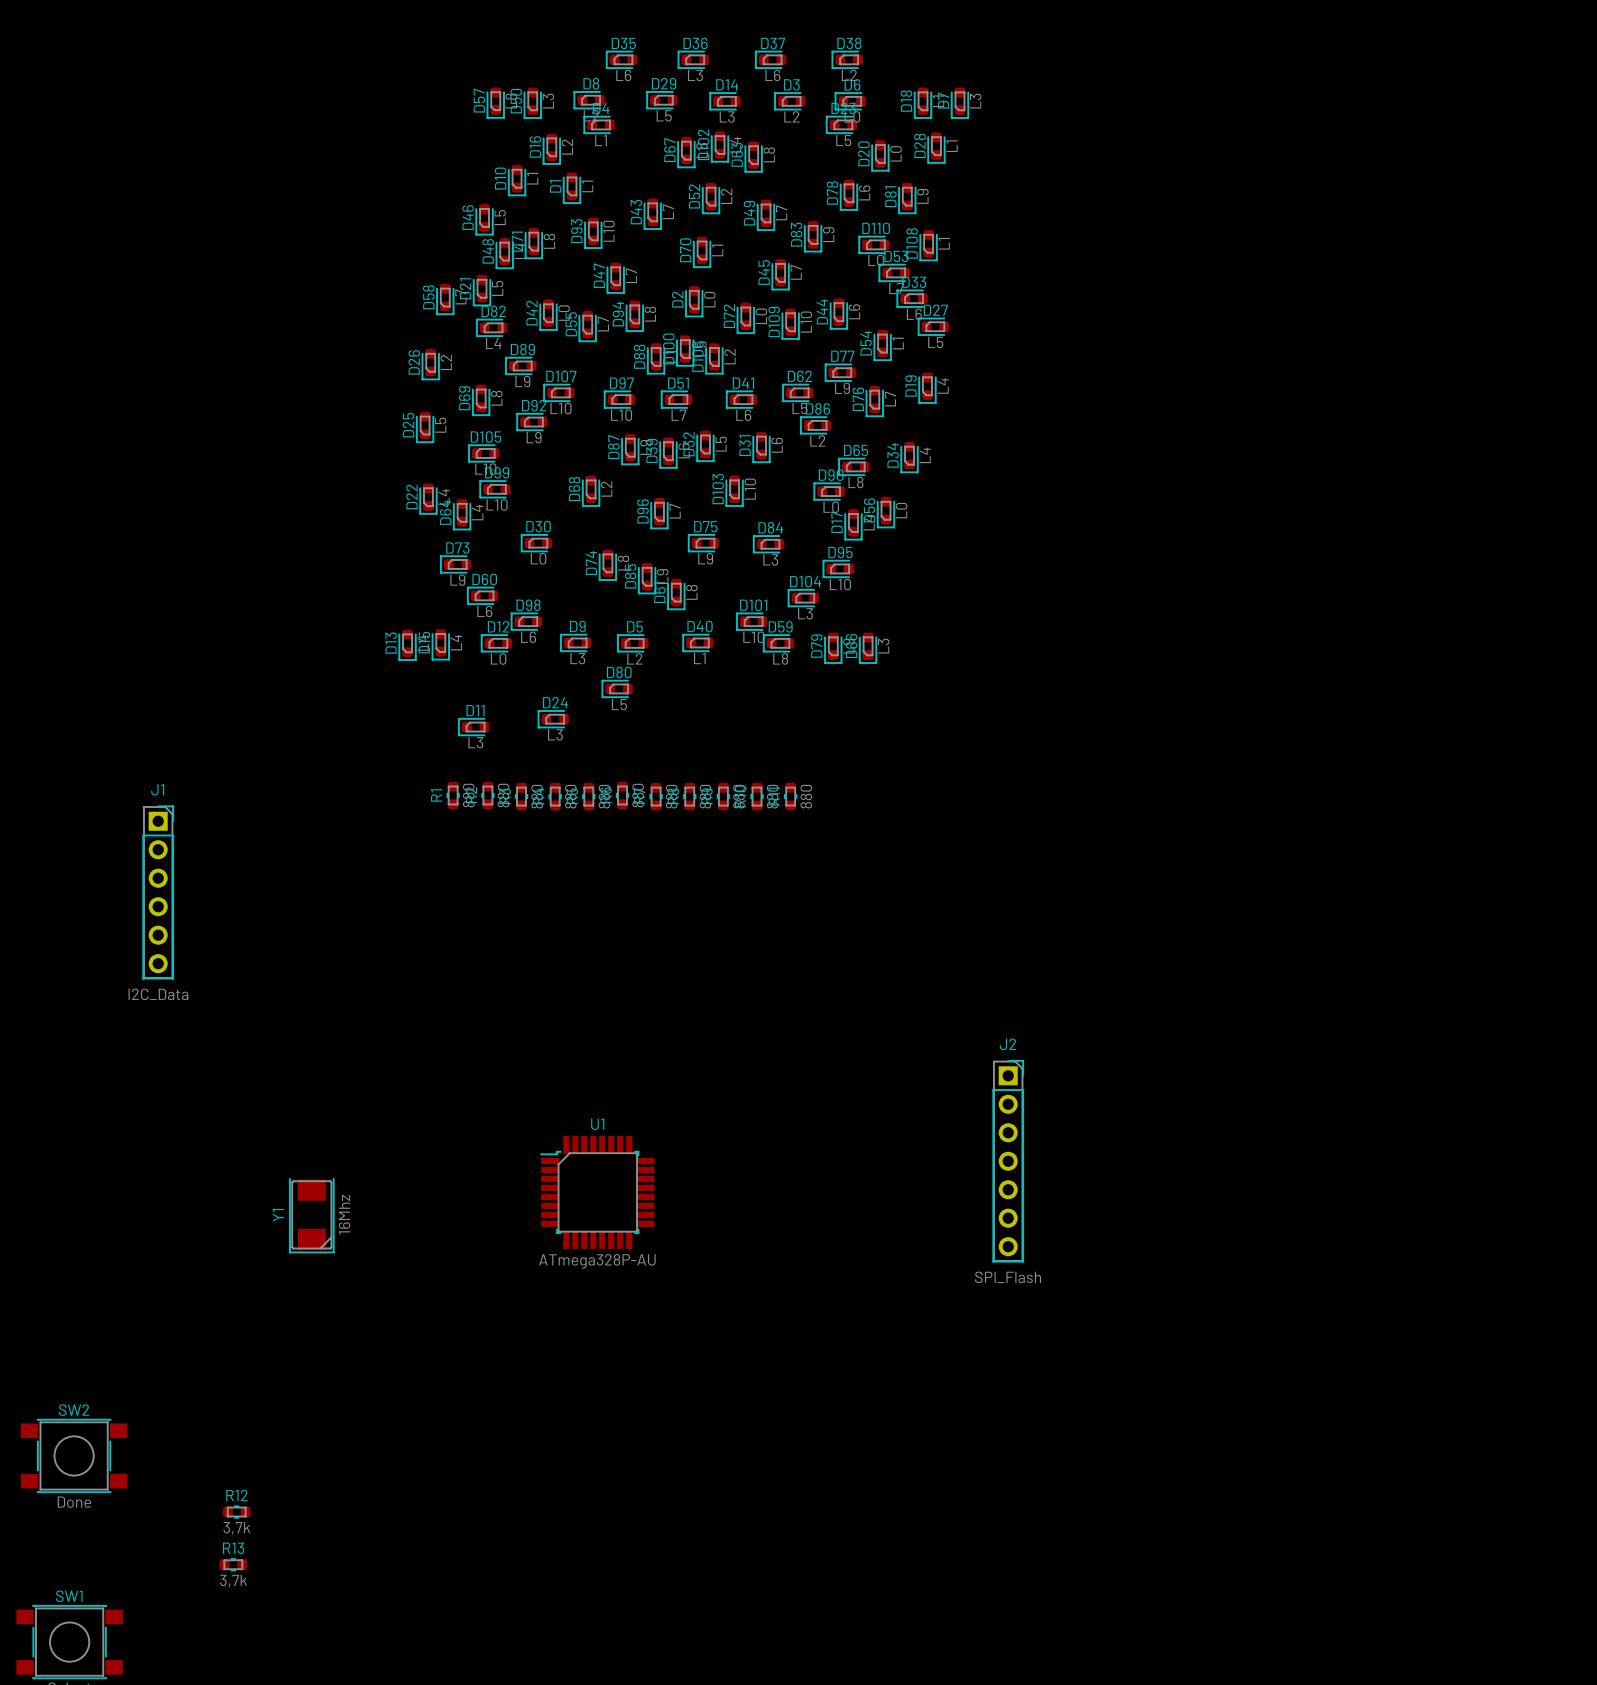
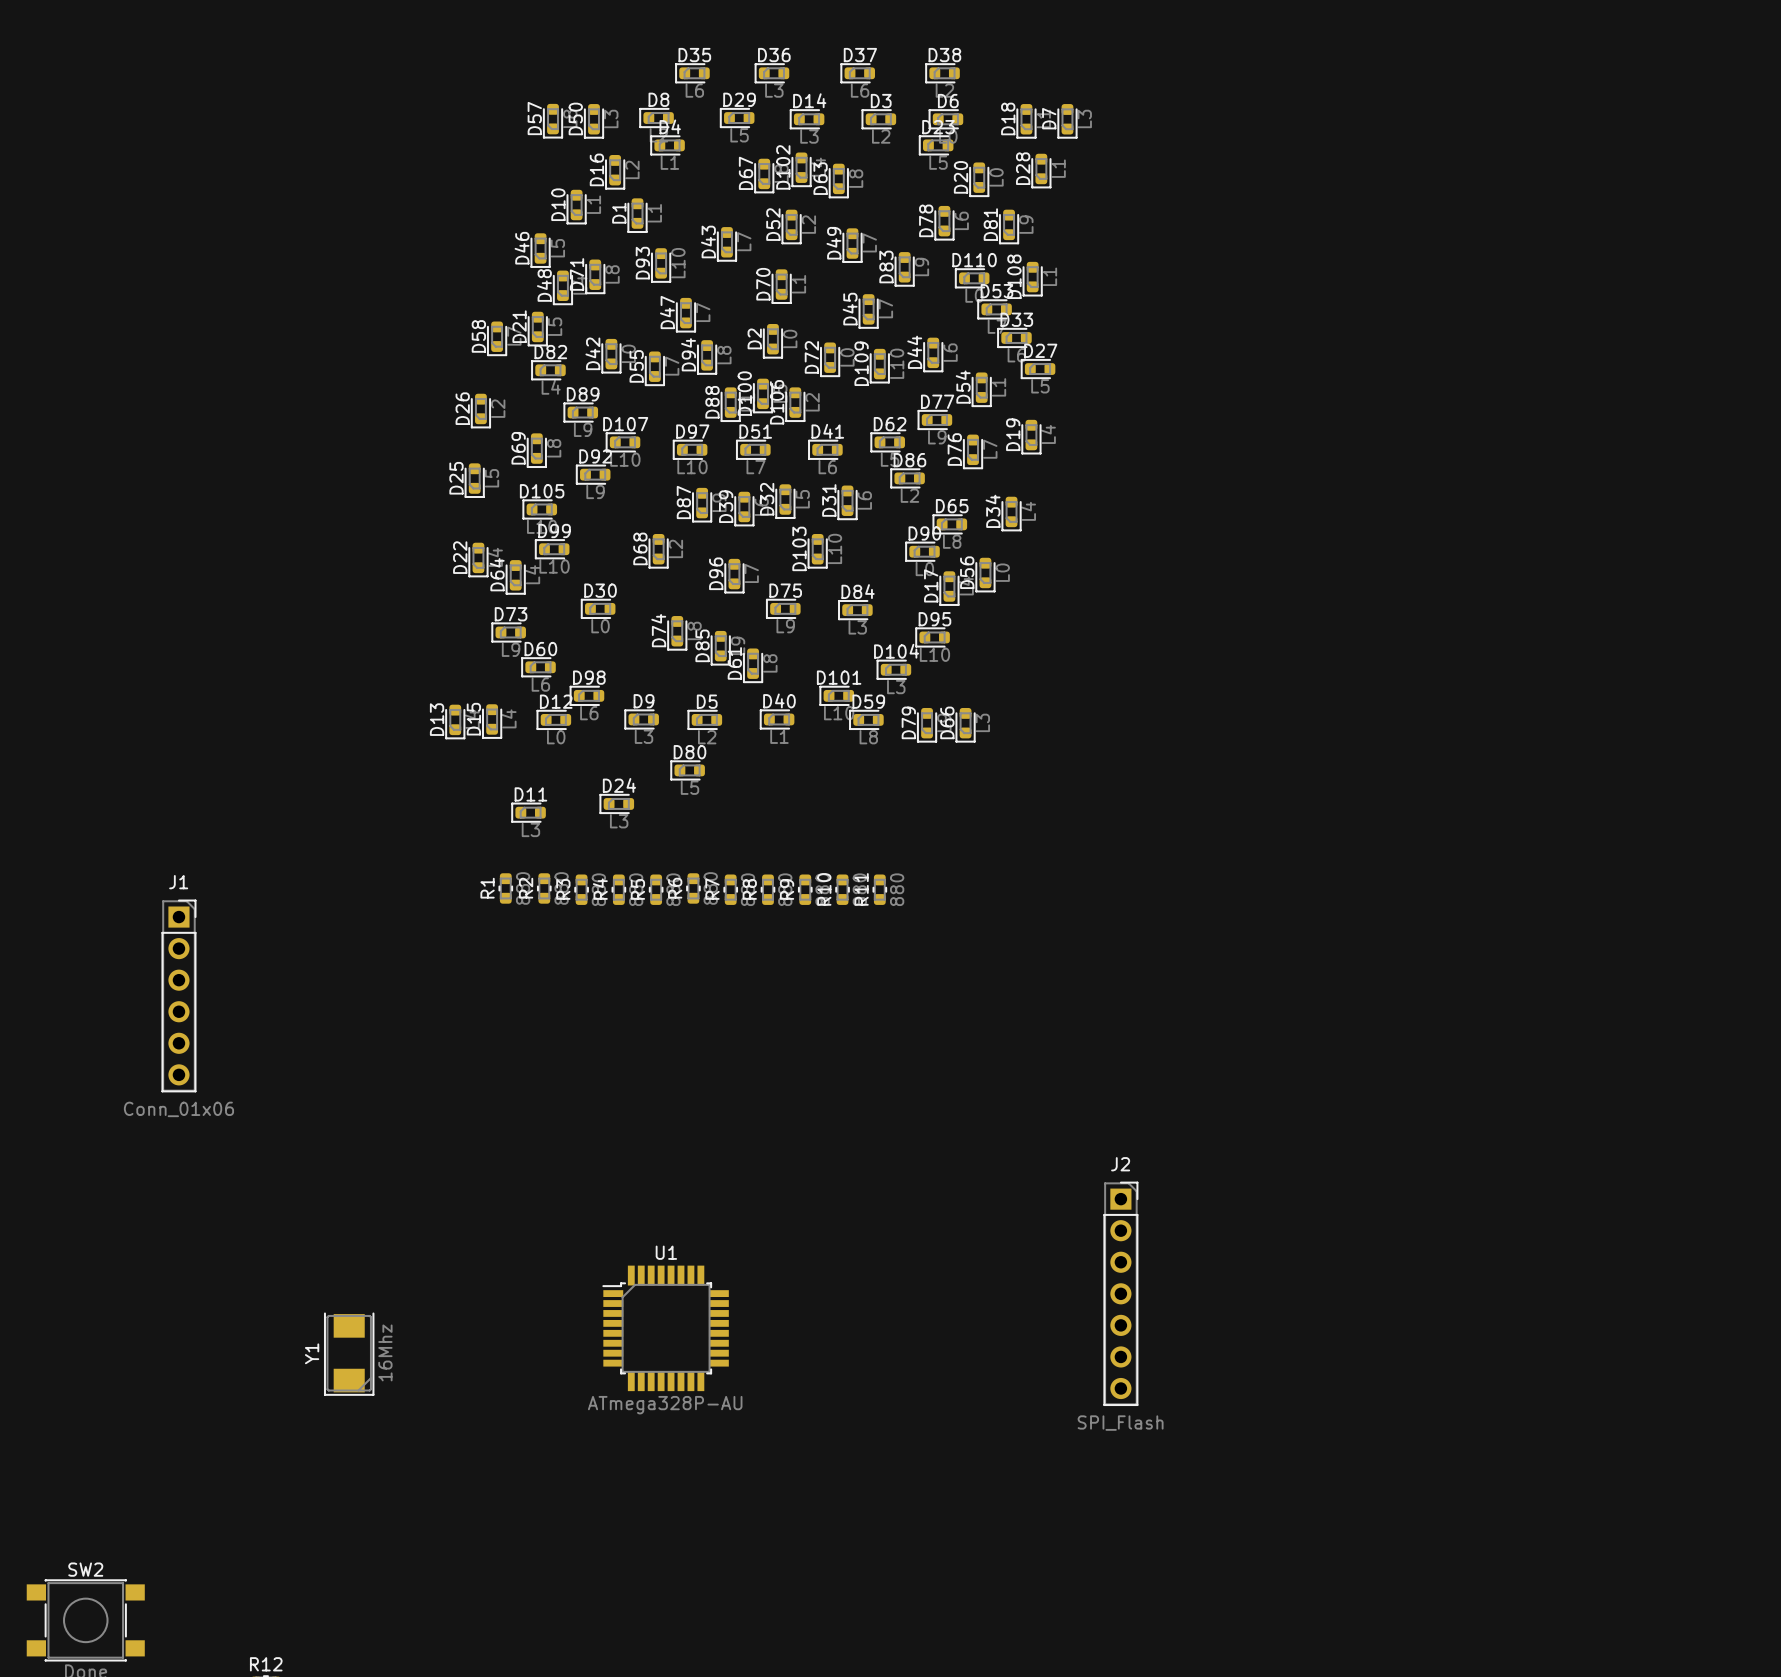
J1 value: I2C_Data (158, 994) -> Conn_01x06 (178, 1109)

